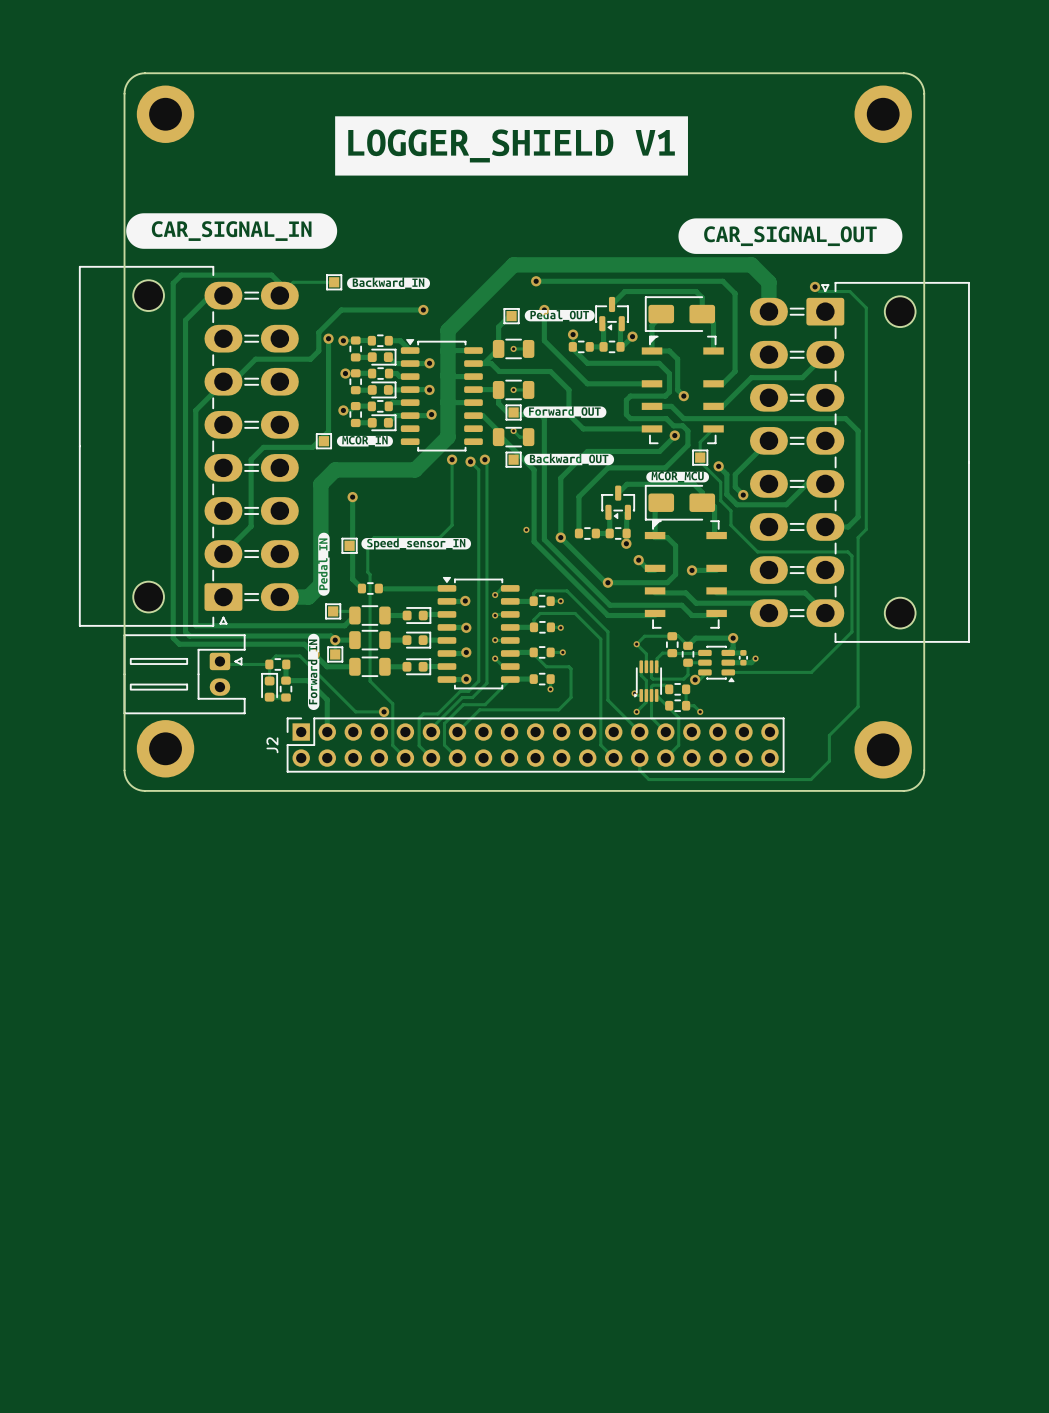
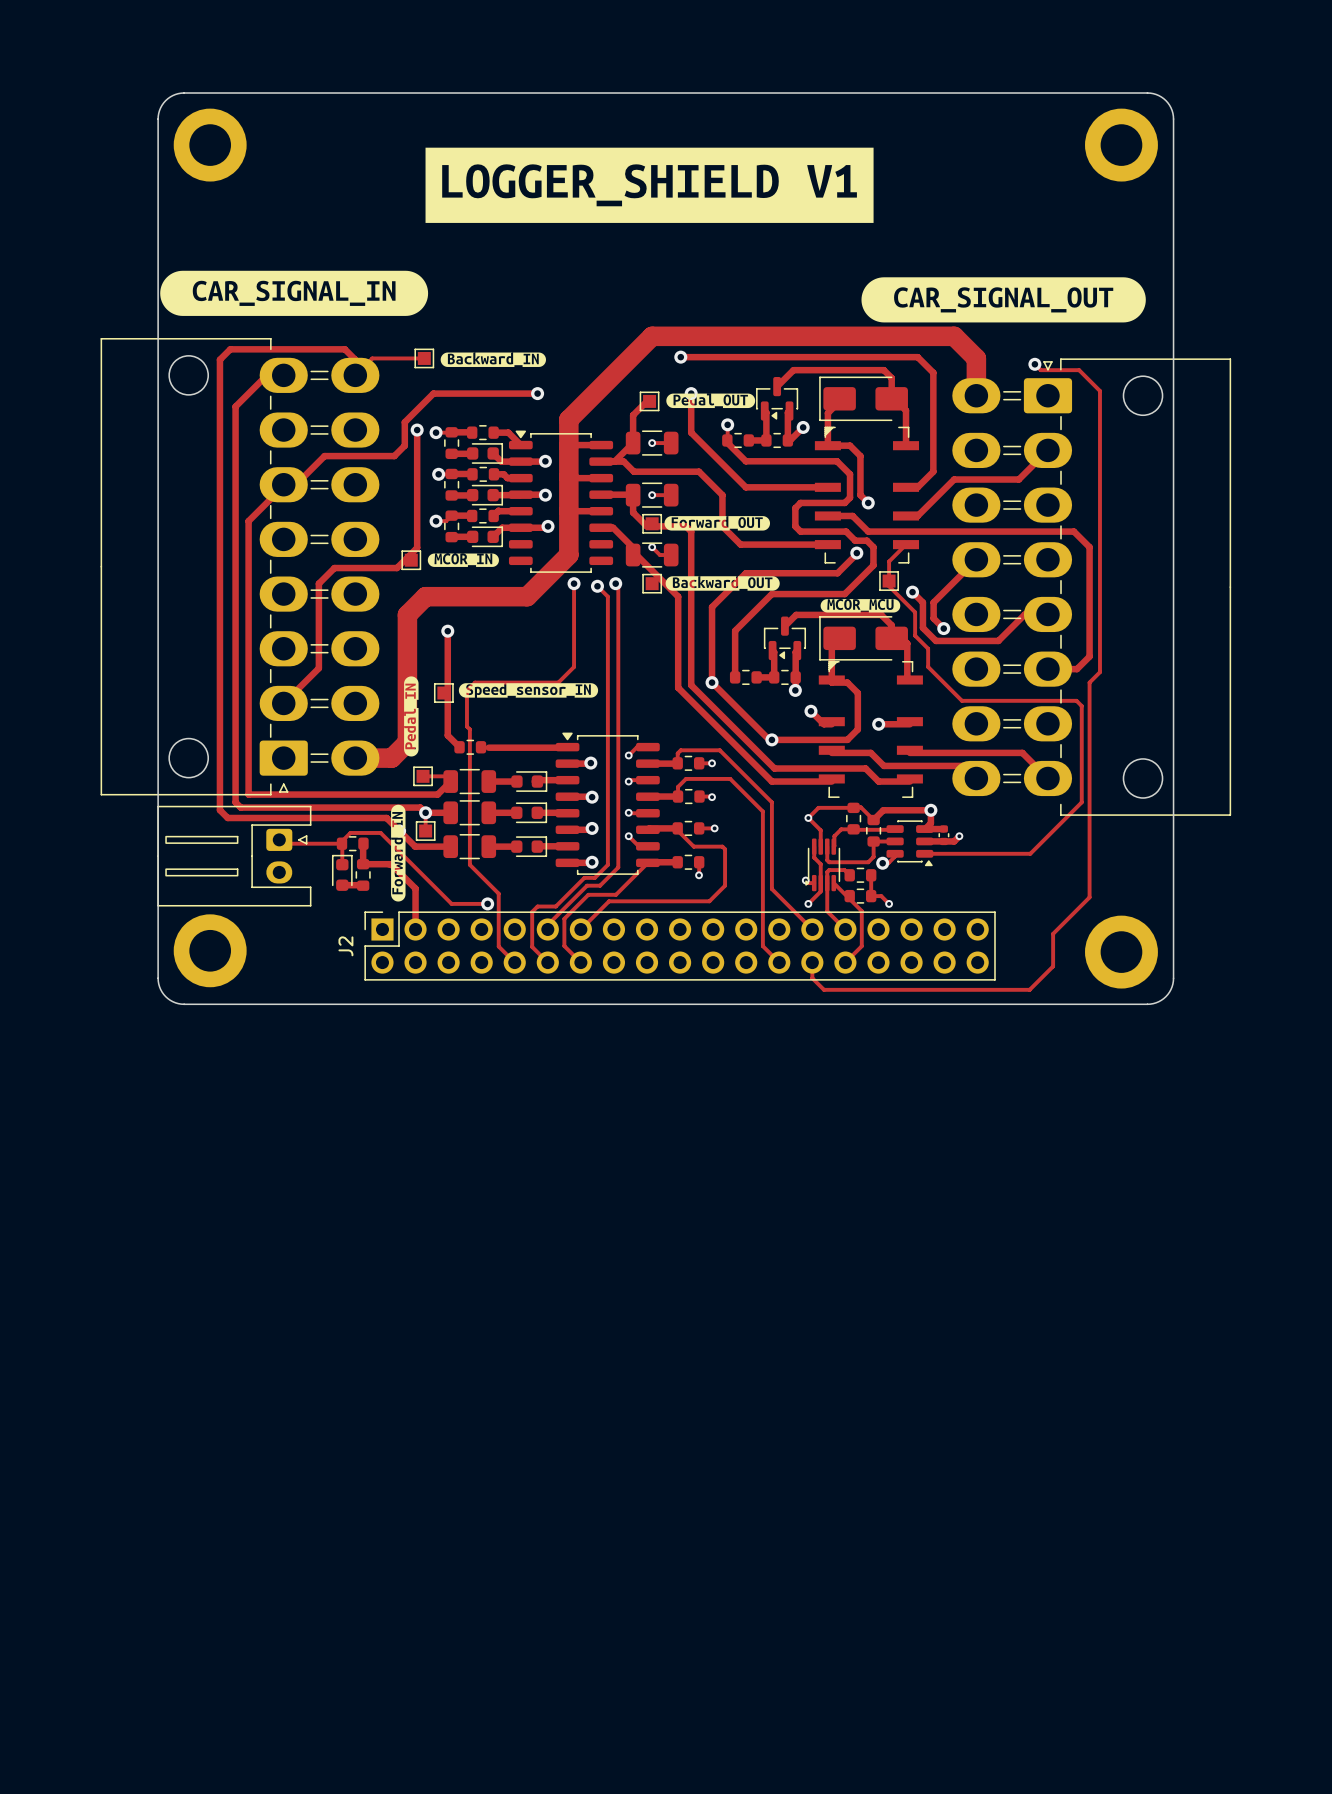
via: (526, 529) -> none

